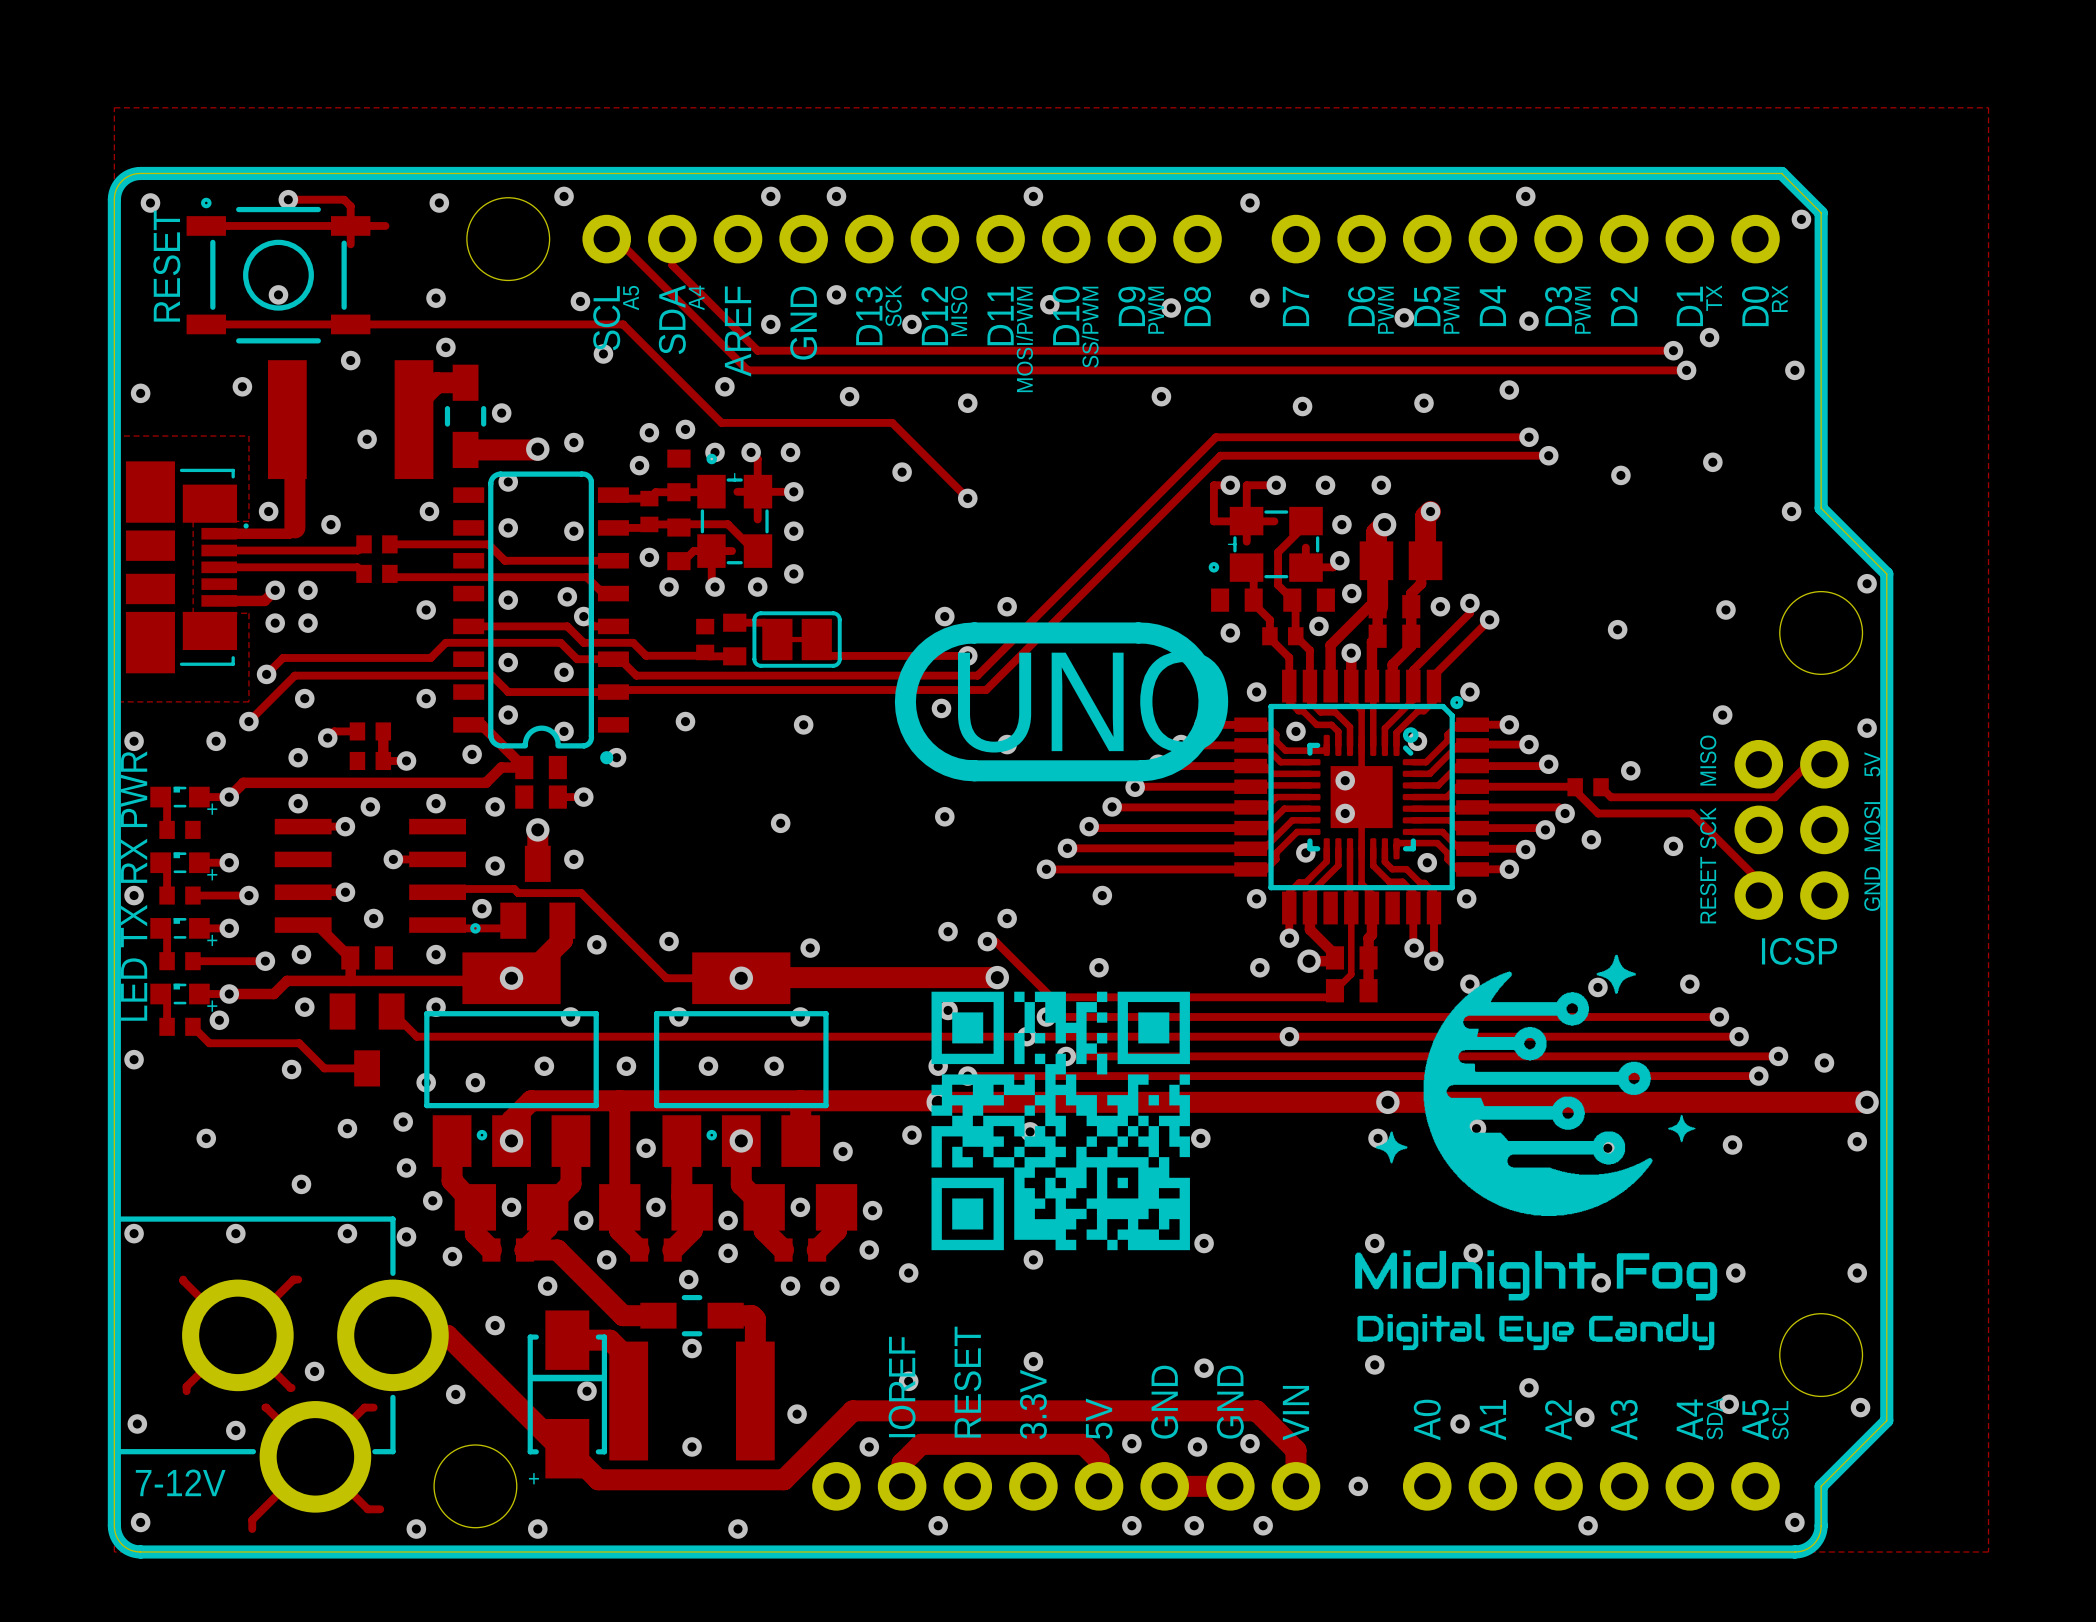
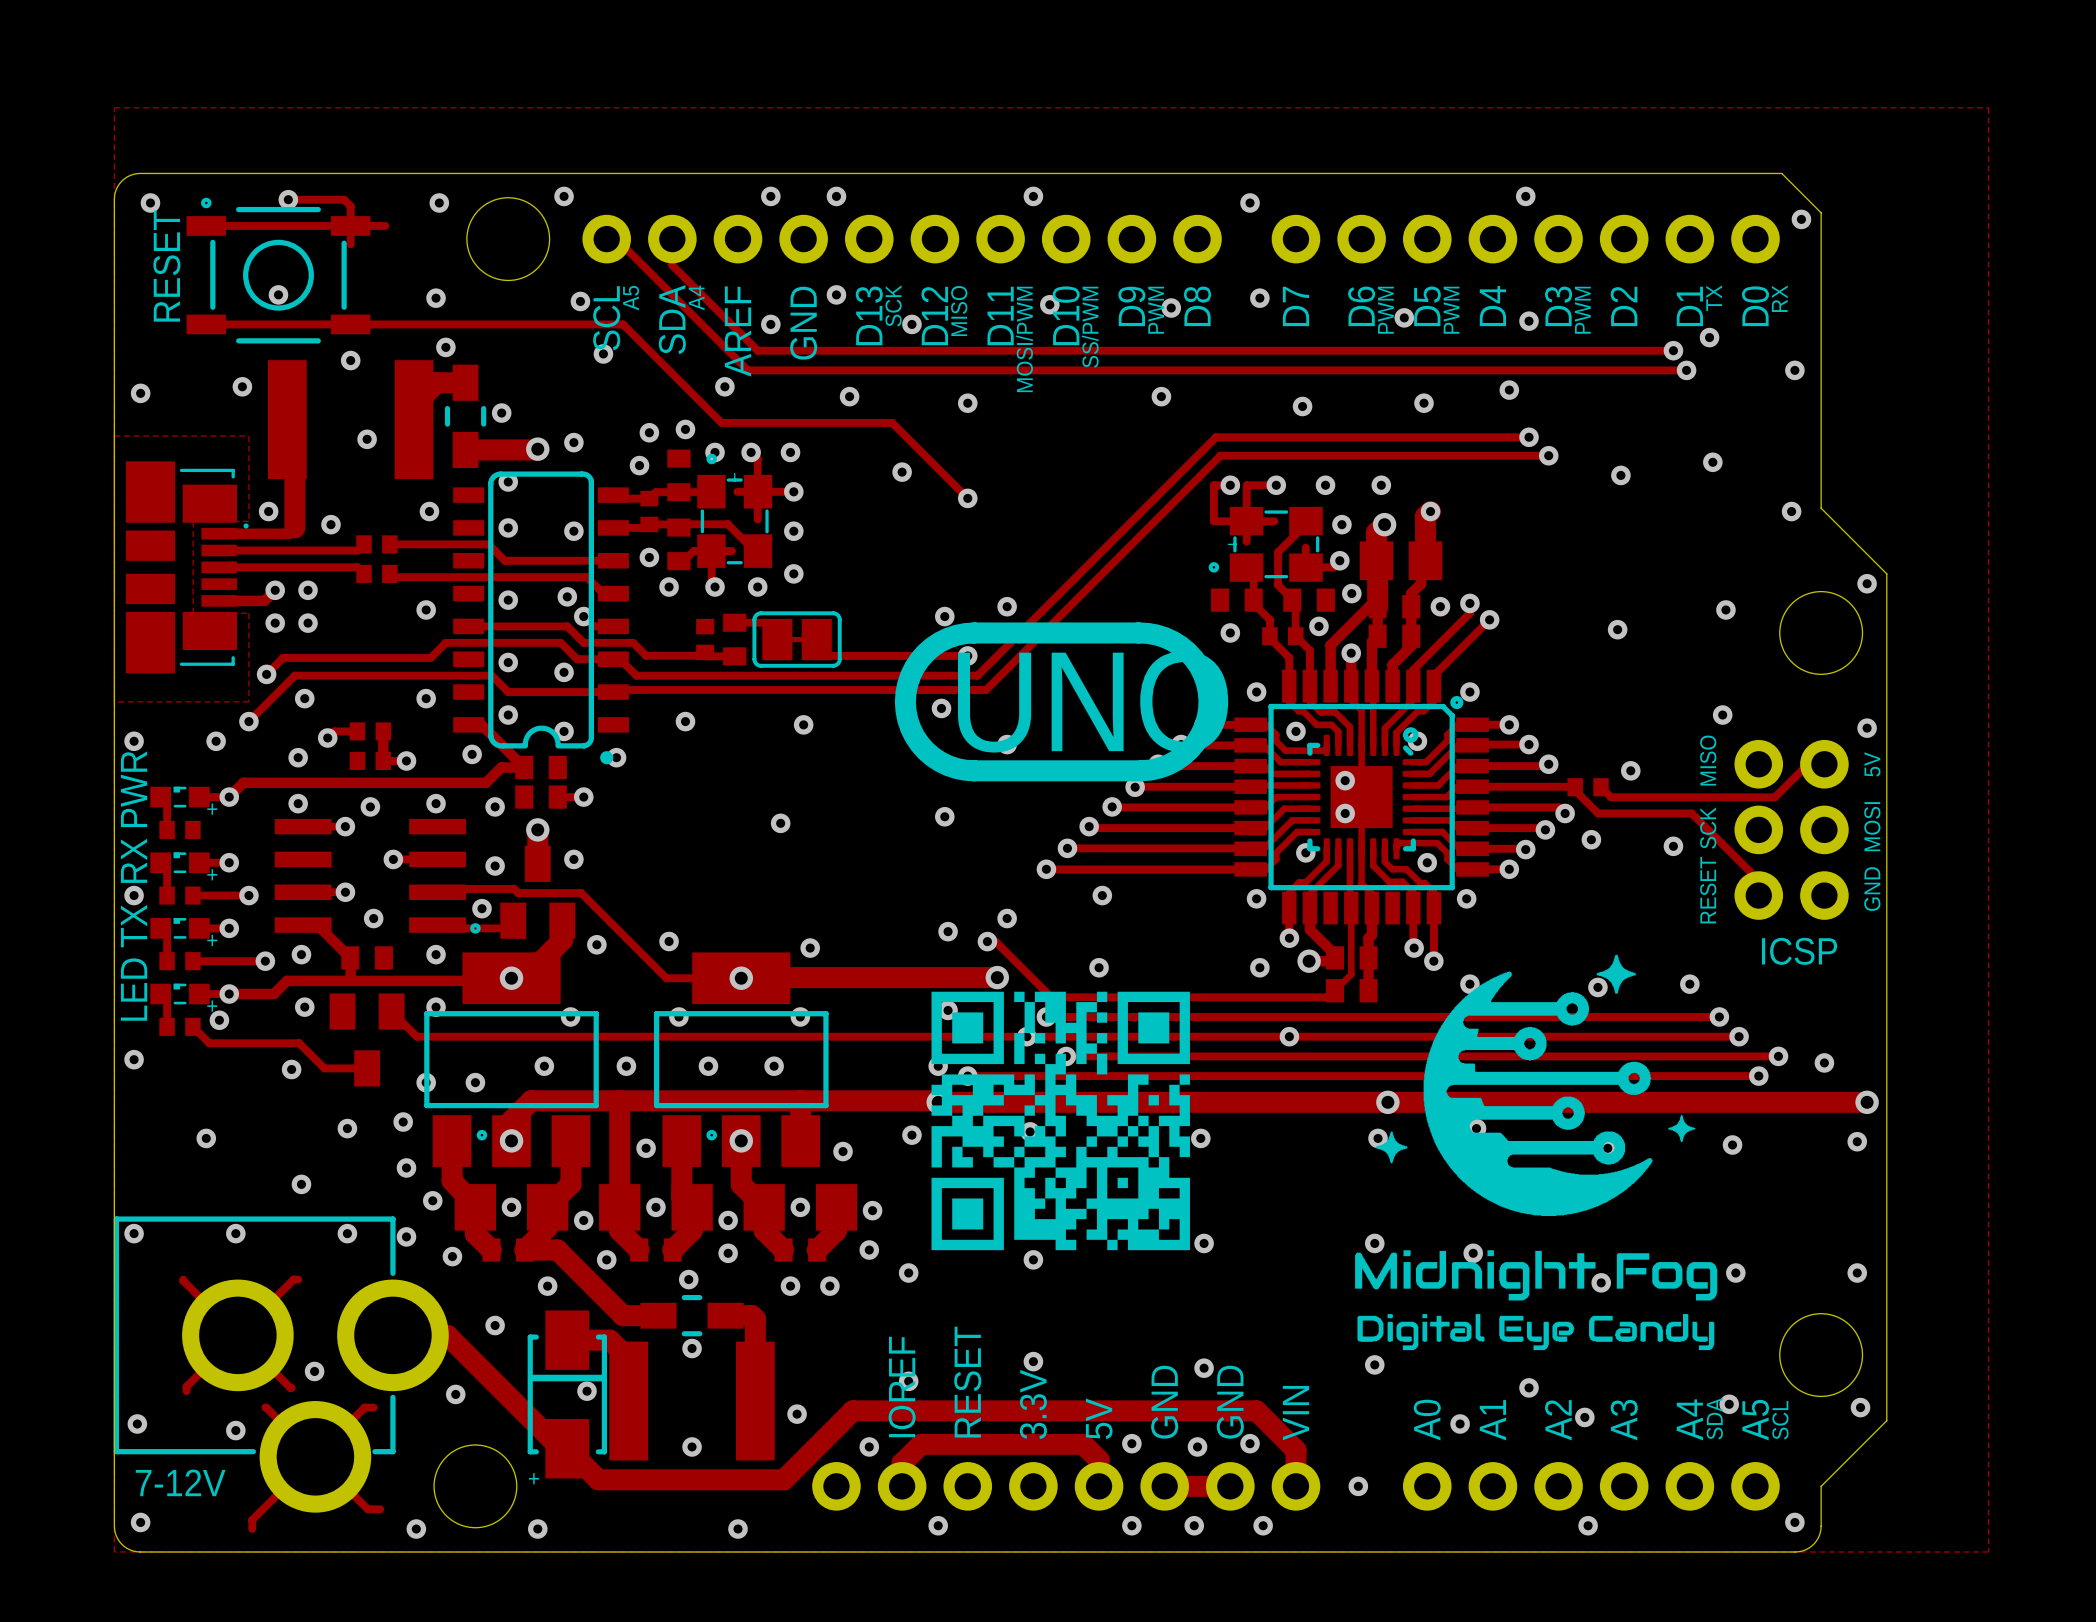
line: (140, 173) (1781, 173) (1821, 212) (1821, 508) (1886, 573) (1886, 1420) (1821, 1486) (1820, 1529) (1815, 1541) (1804, 1550) (1794, 1551) (140, 1551) (124, 1546) (116, 1535) (114, 1525) (114, 199) (116, 189) (122, 181) (130, 175) (140, 173) -> none

